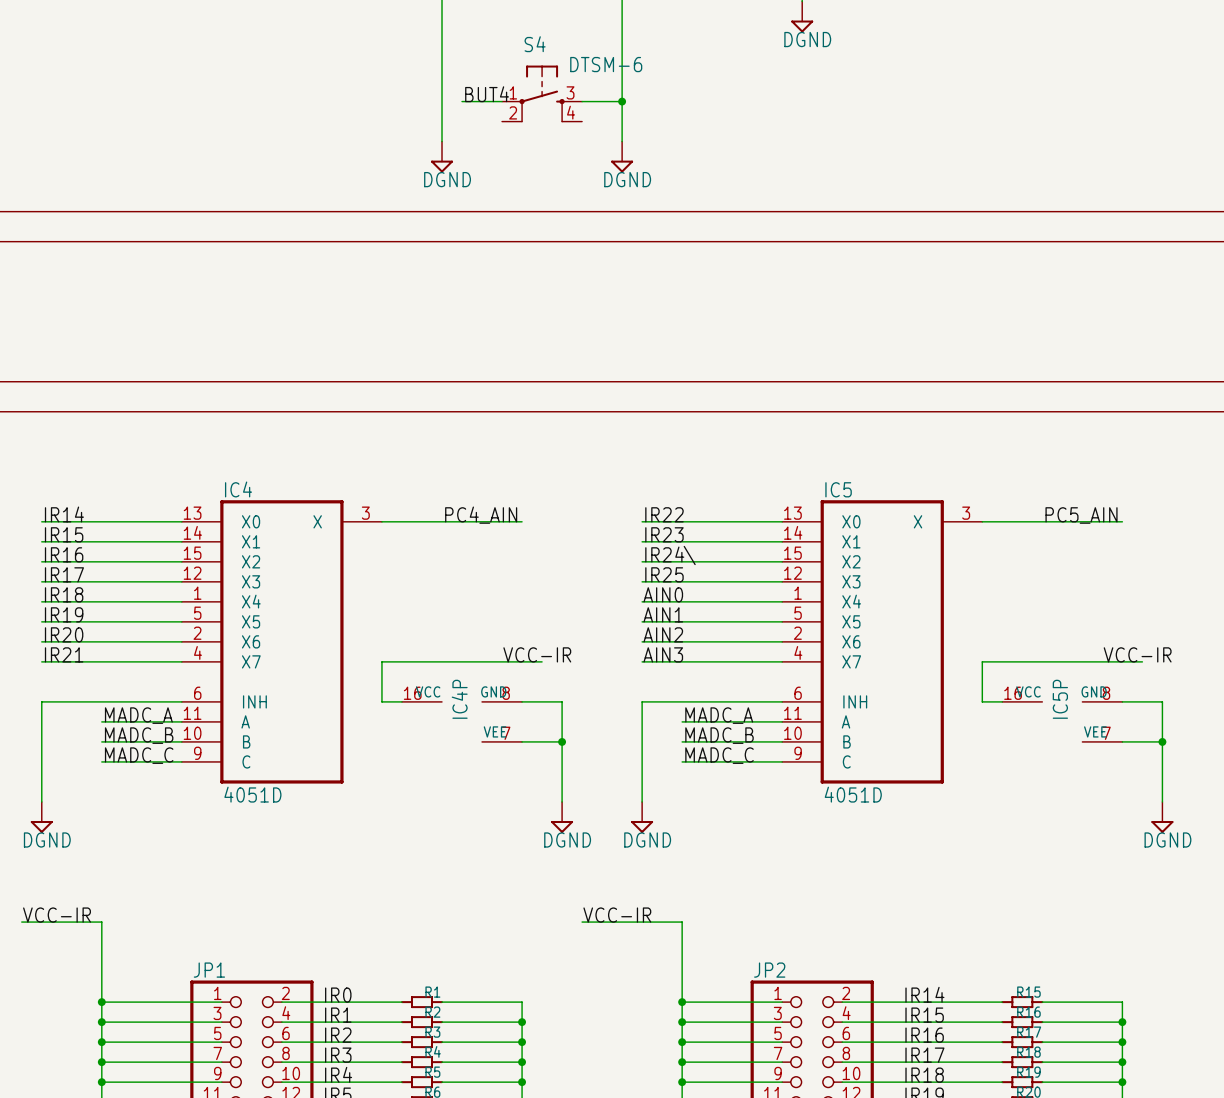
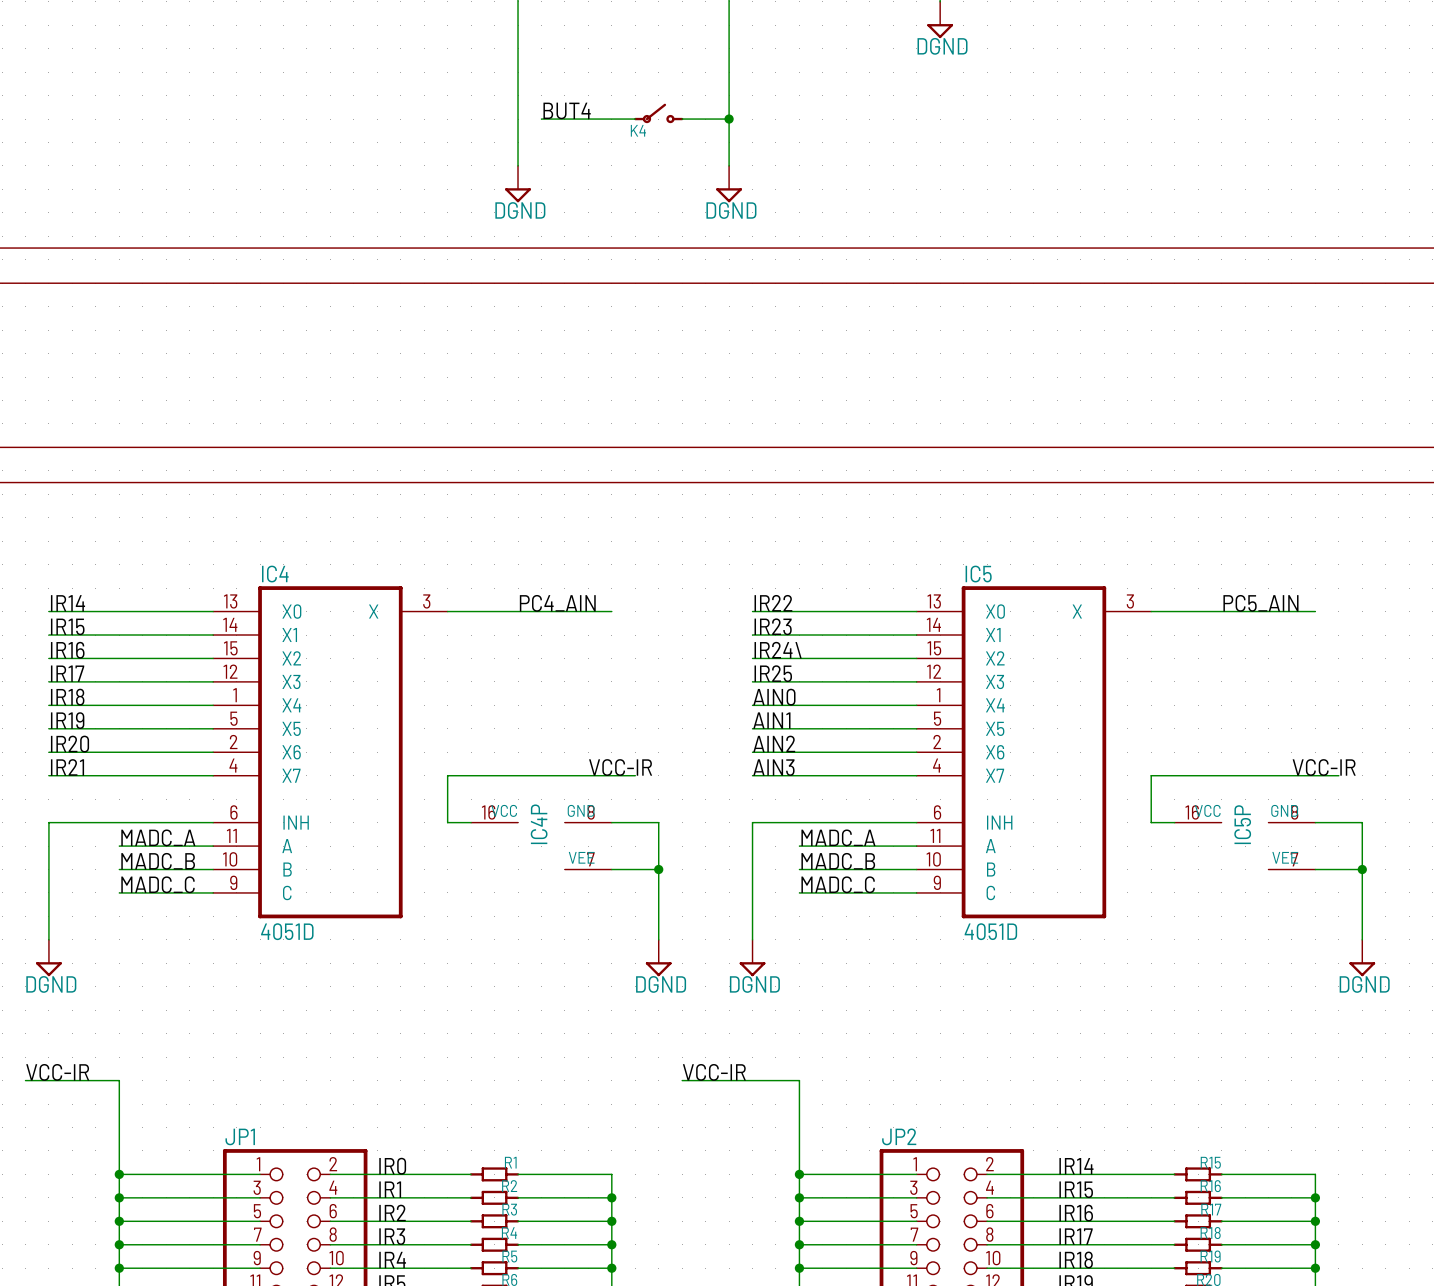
S4: DTSM-6 (542, 93) -> none
K4: none -> (658, 113)

